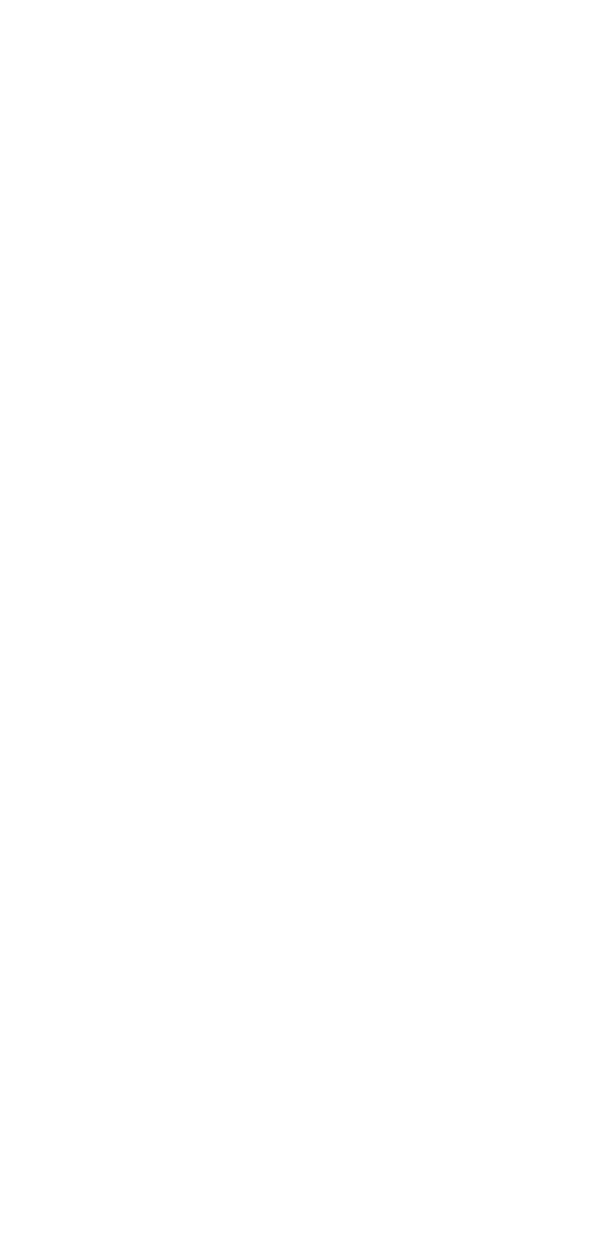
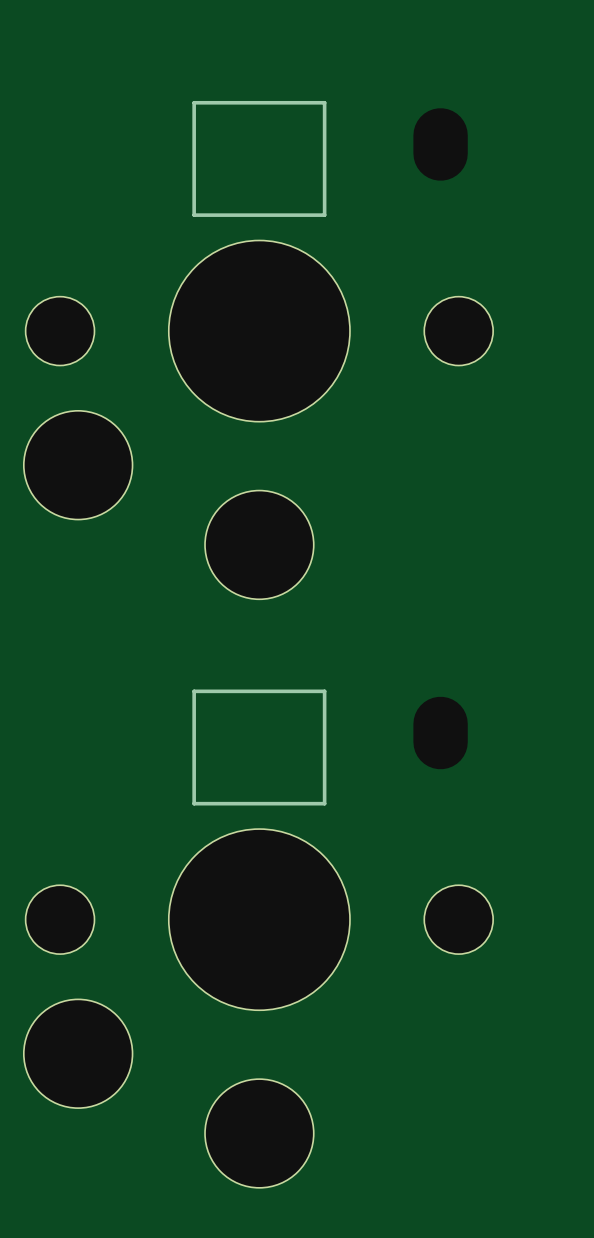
part: none -> (258, 350)
part: none -> (258, 938)

